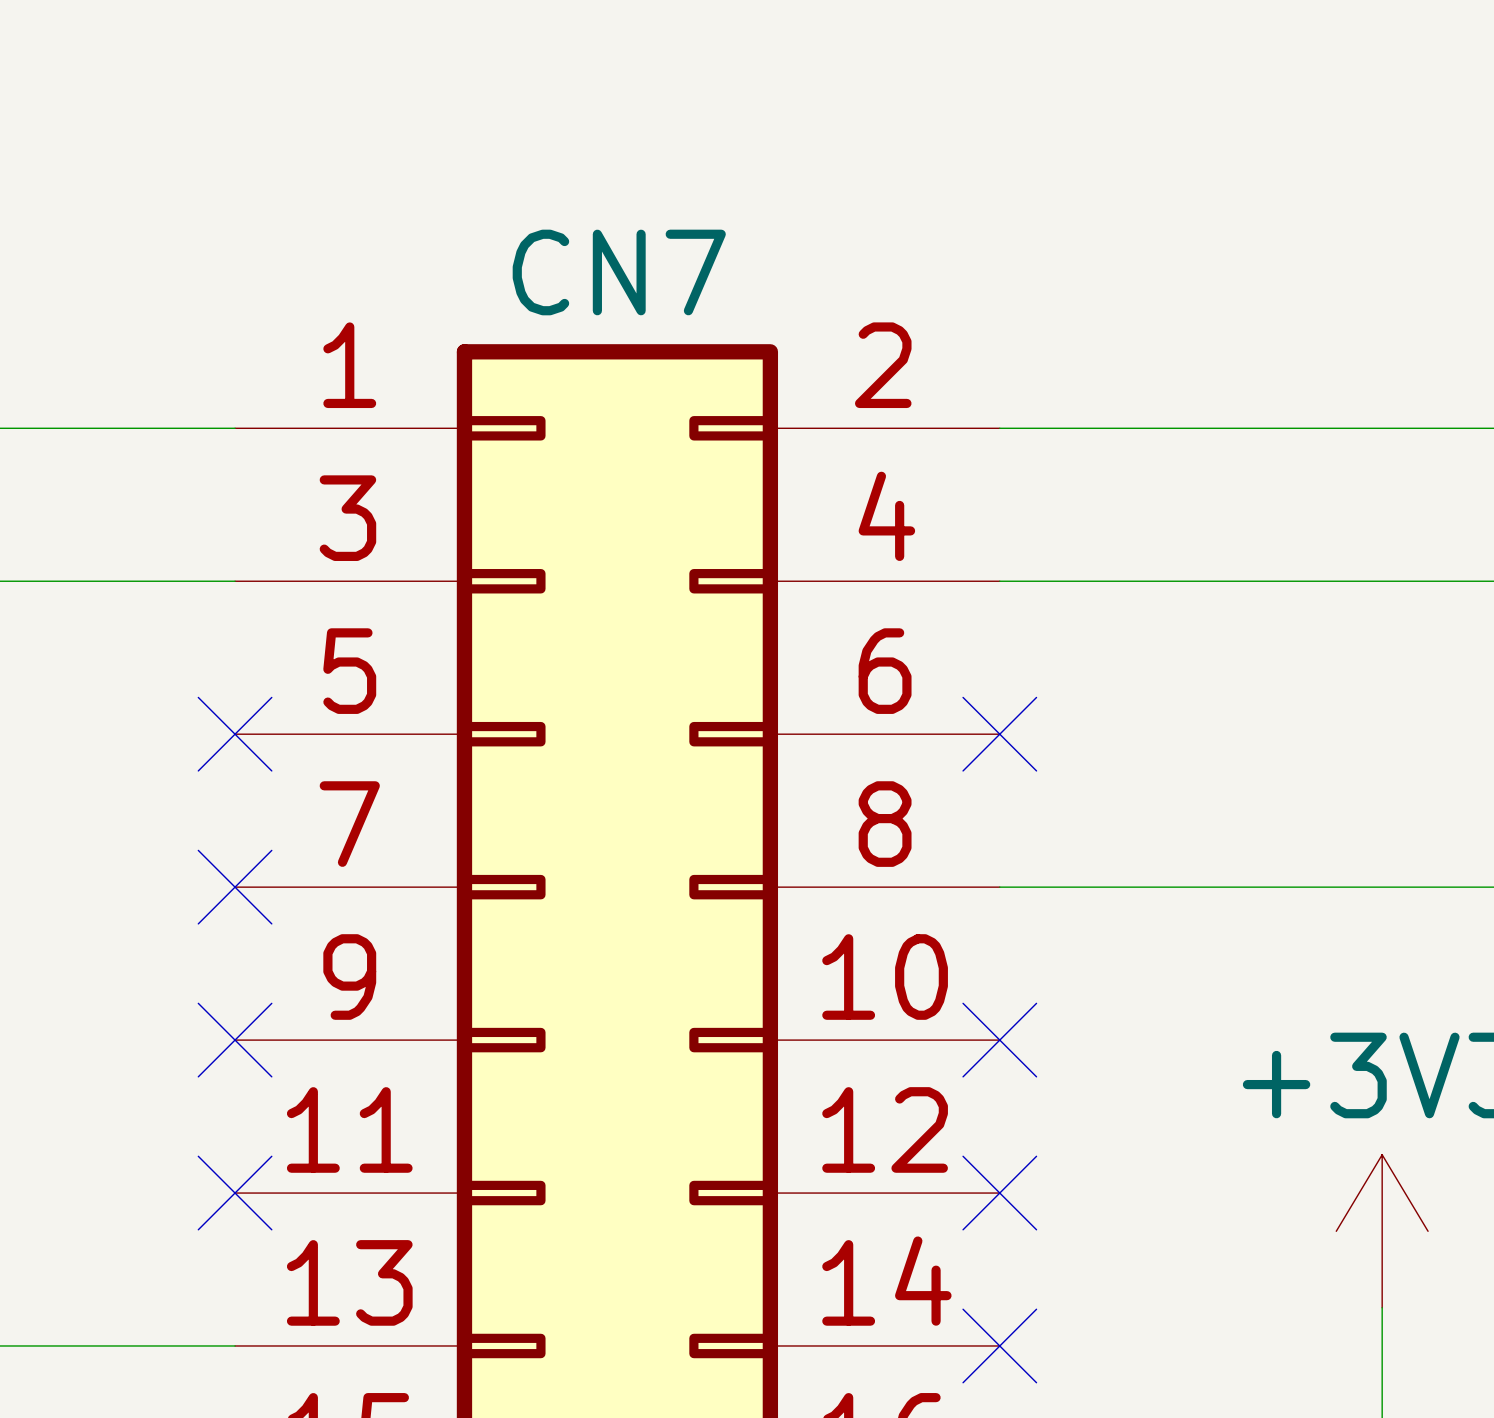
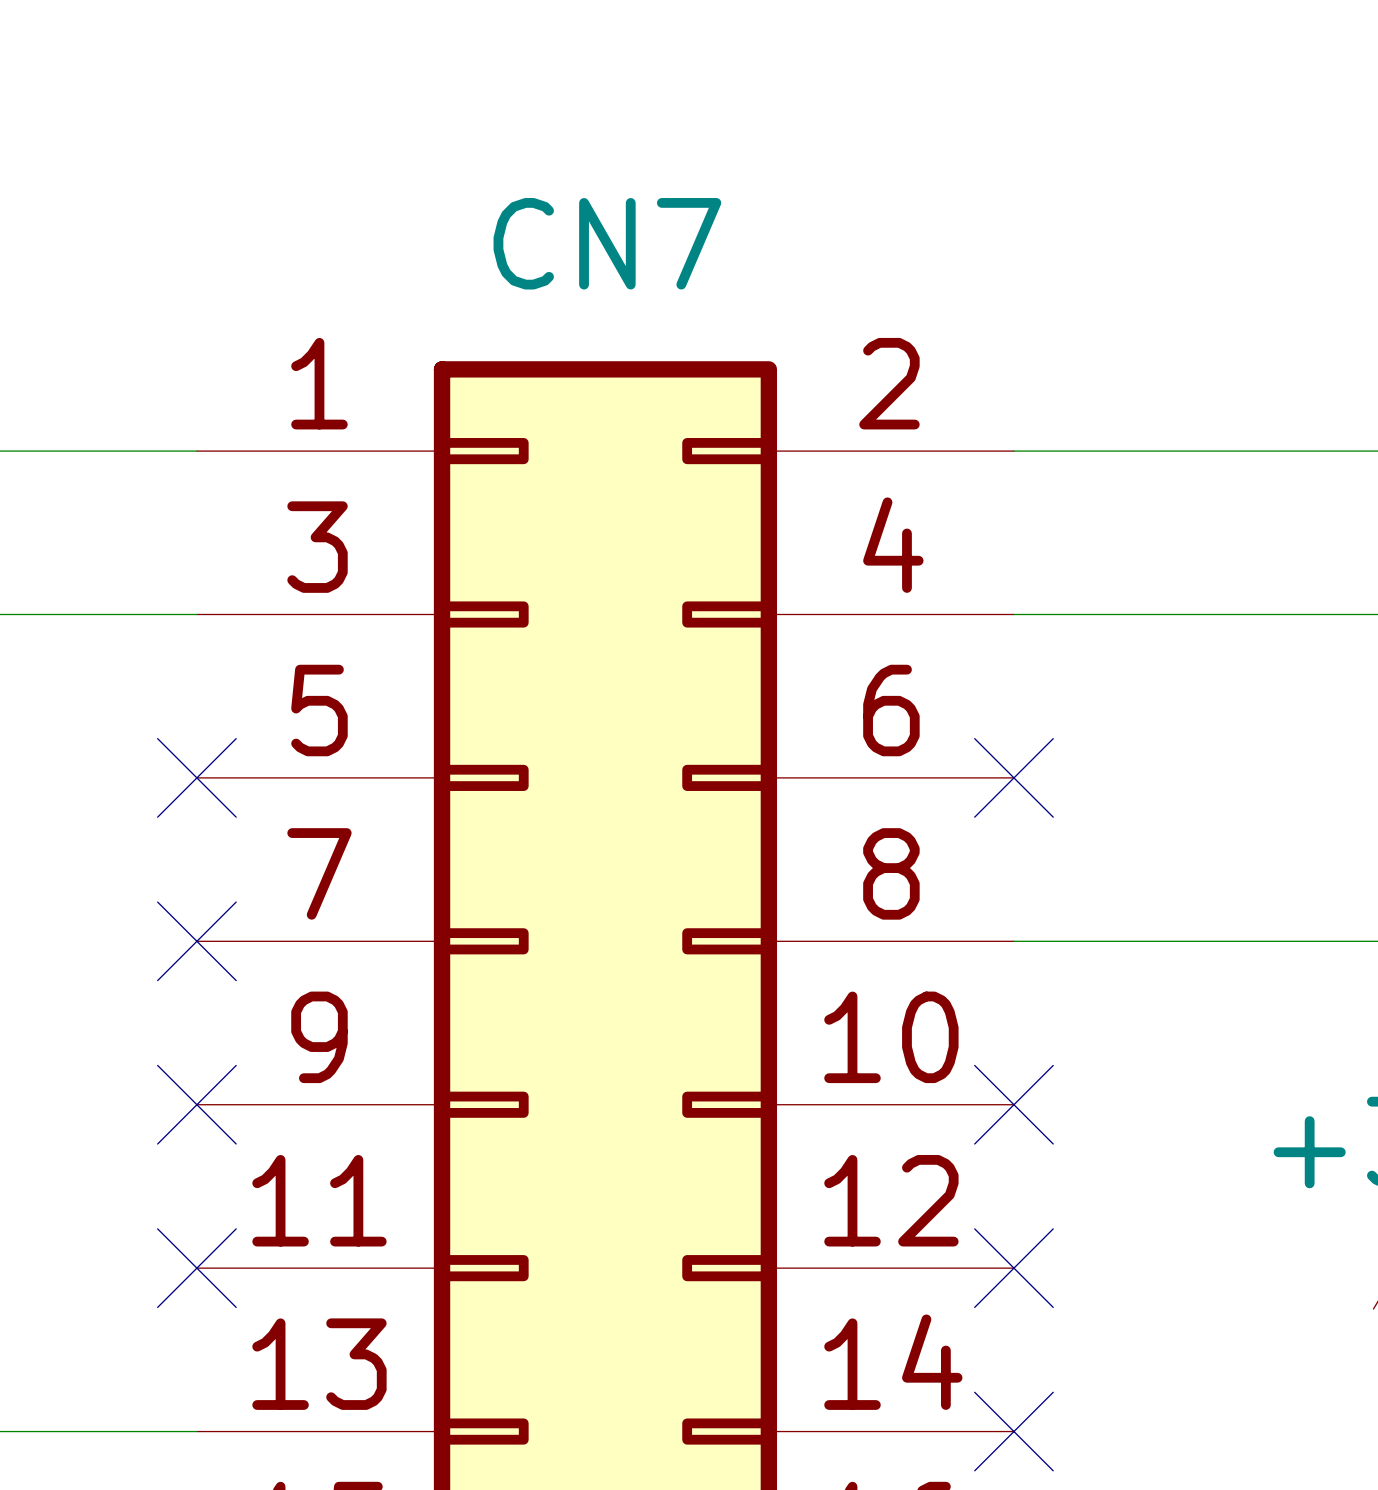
CN7 name position: CN7 (619, 272) -> CN7 (607, 243)

